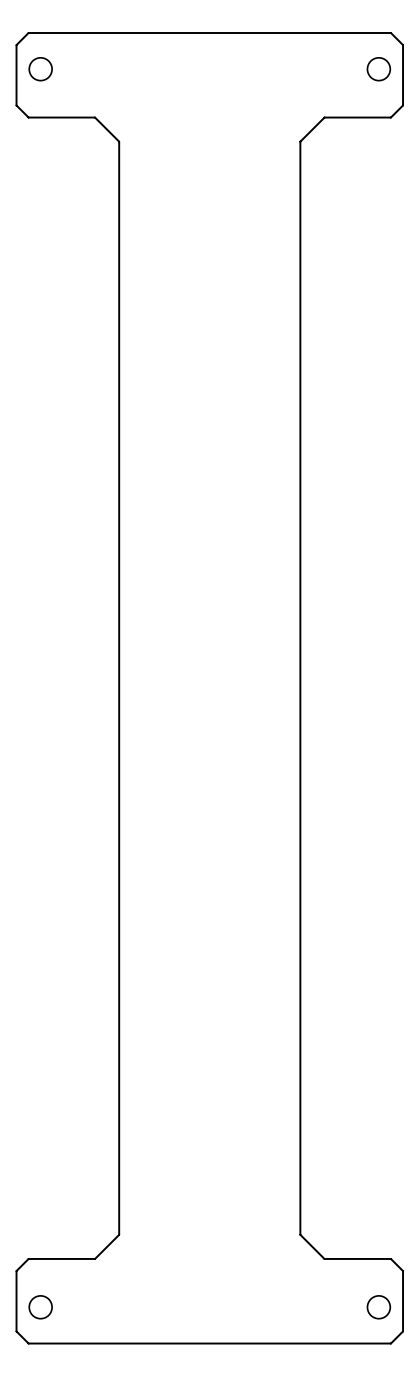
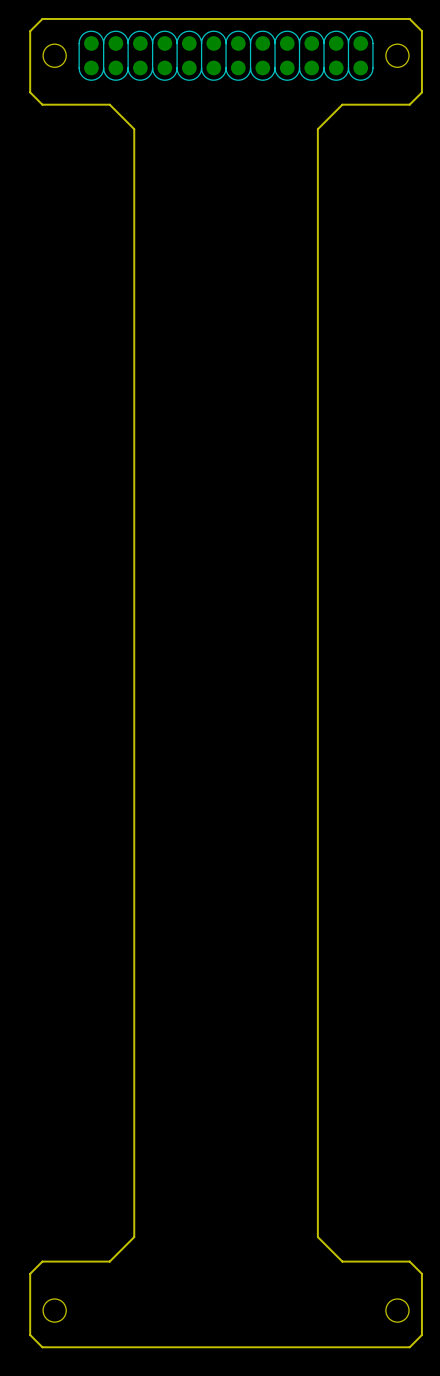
part: none -> (226, 55)

